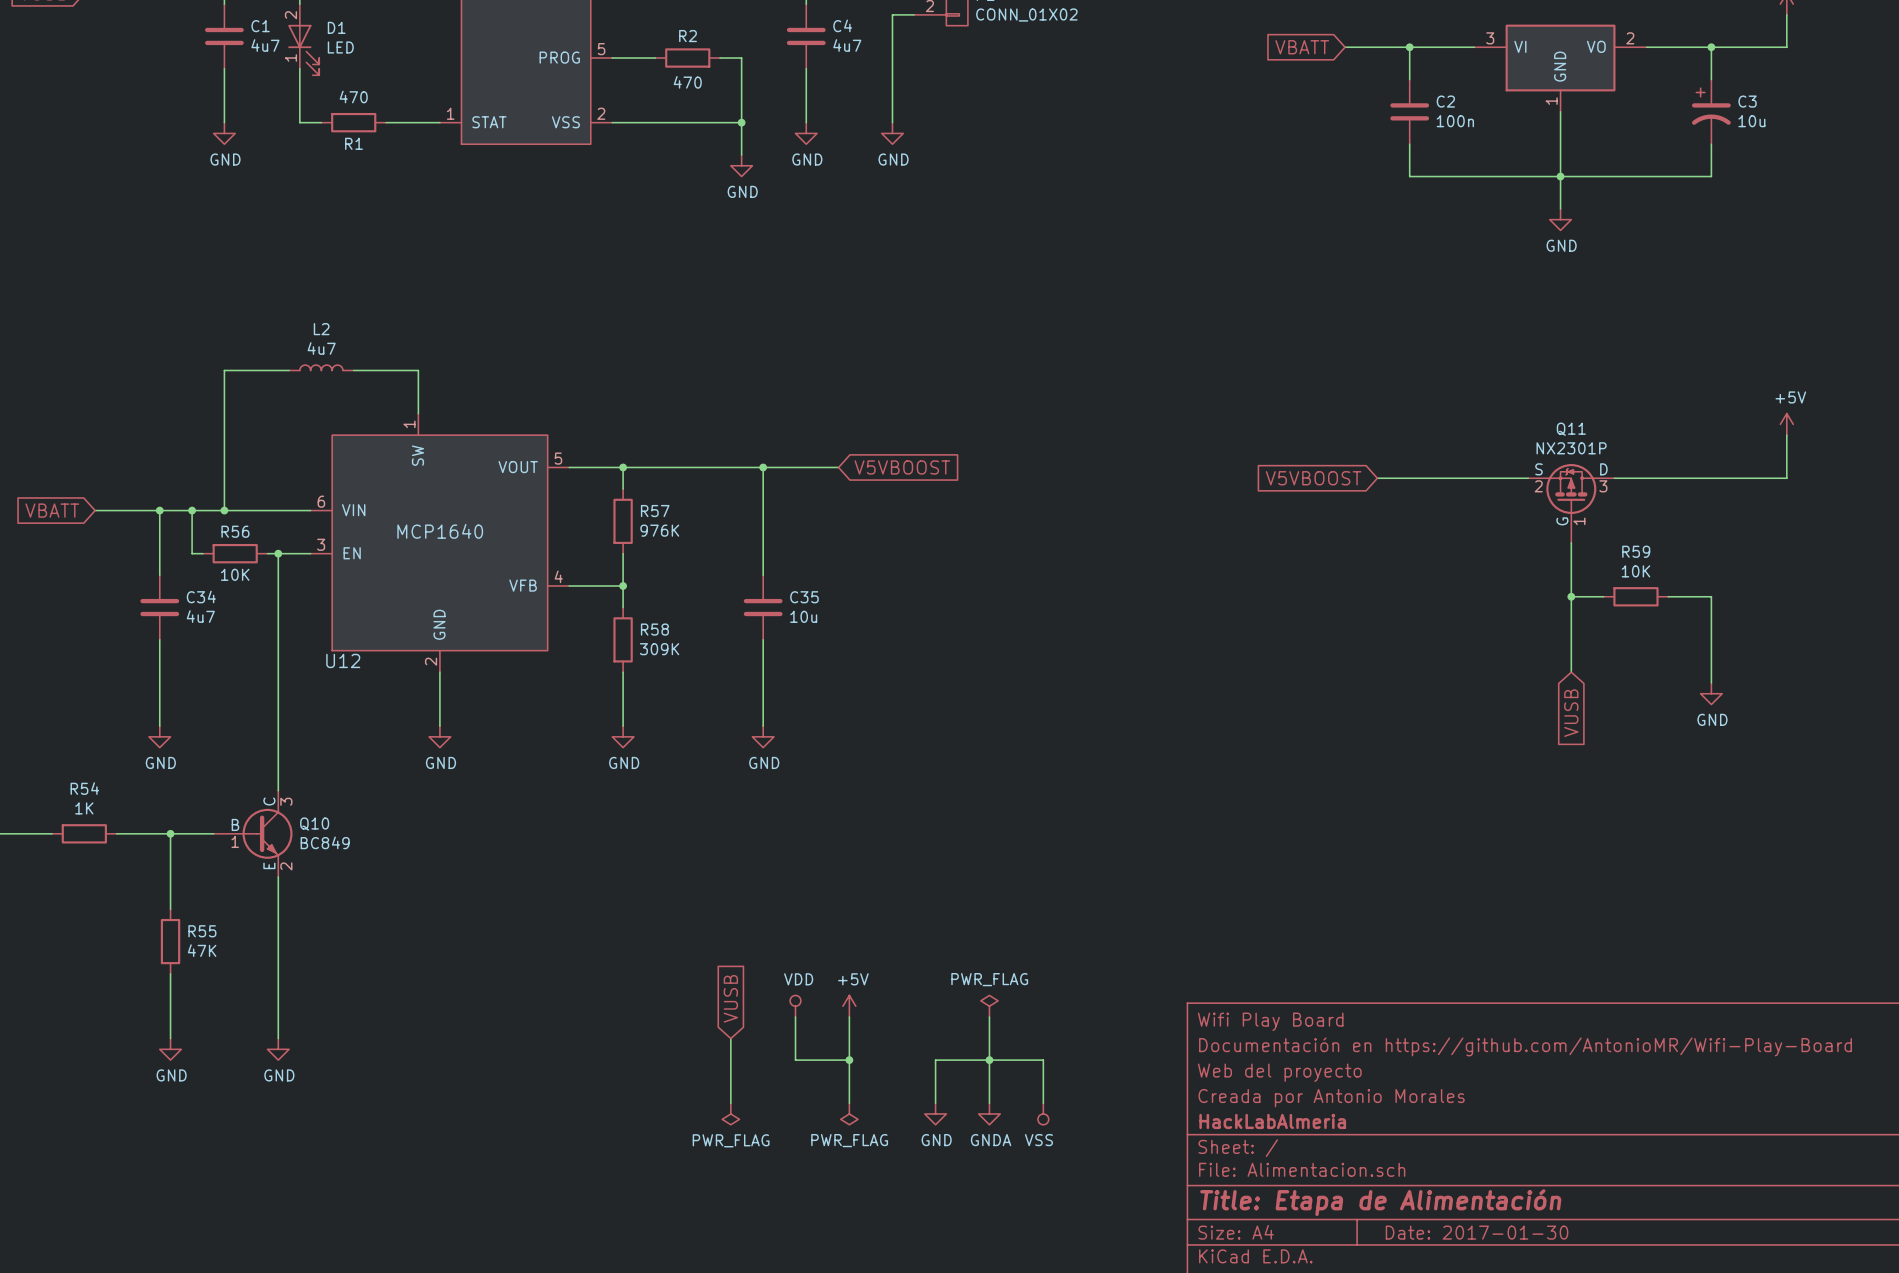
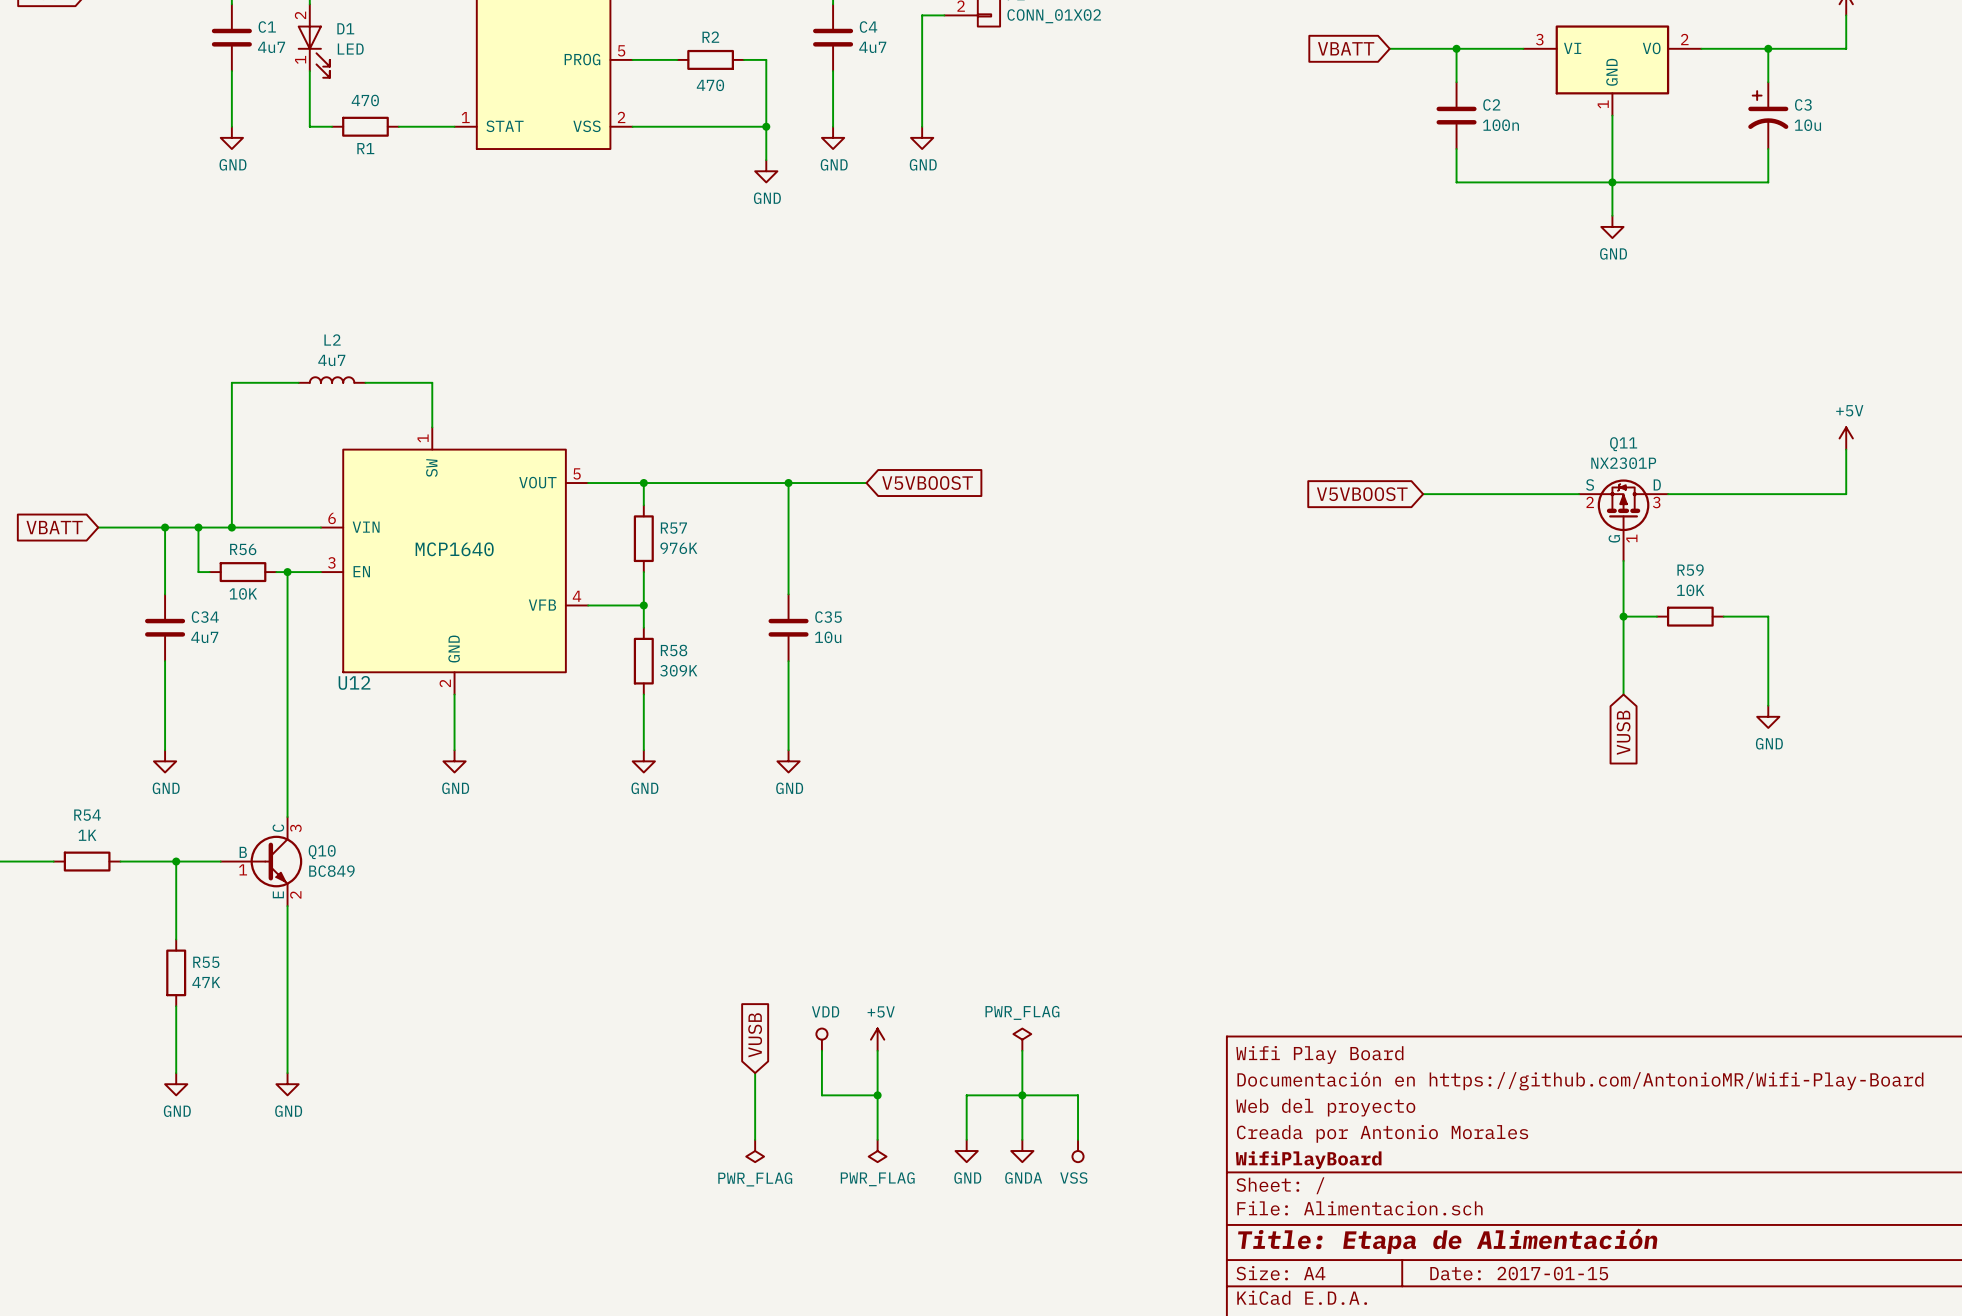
title block: HackLabAlmeria (1272, 1121) -> WifiPlayBoard (1308, 1160)
title block: Date: 2017-01-30 (1477, 1232) -> Date: 2017-01-15 (1519, 1273)

